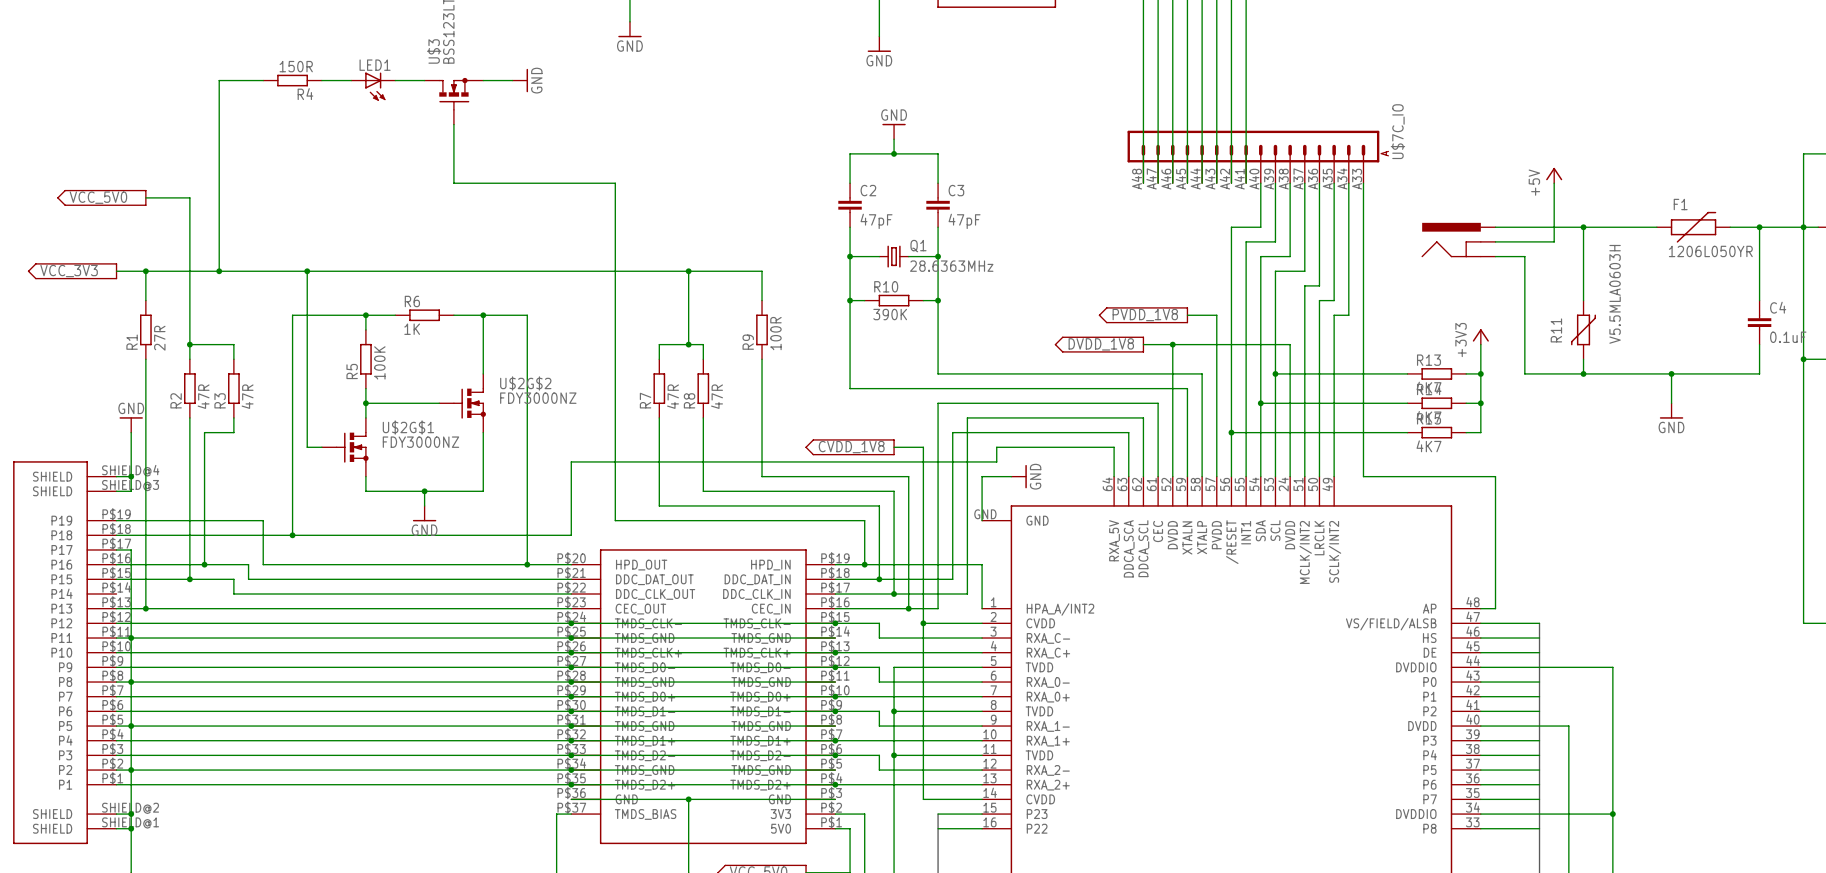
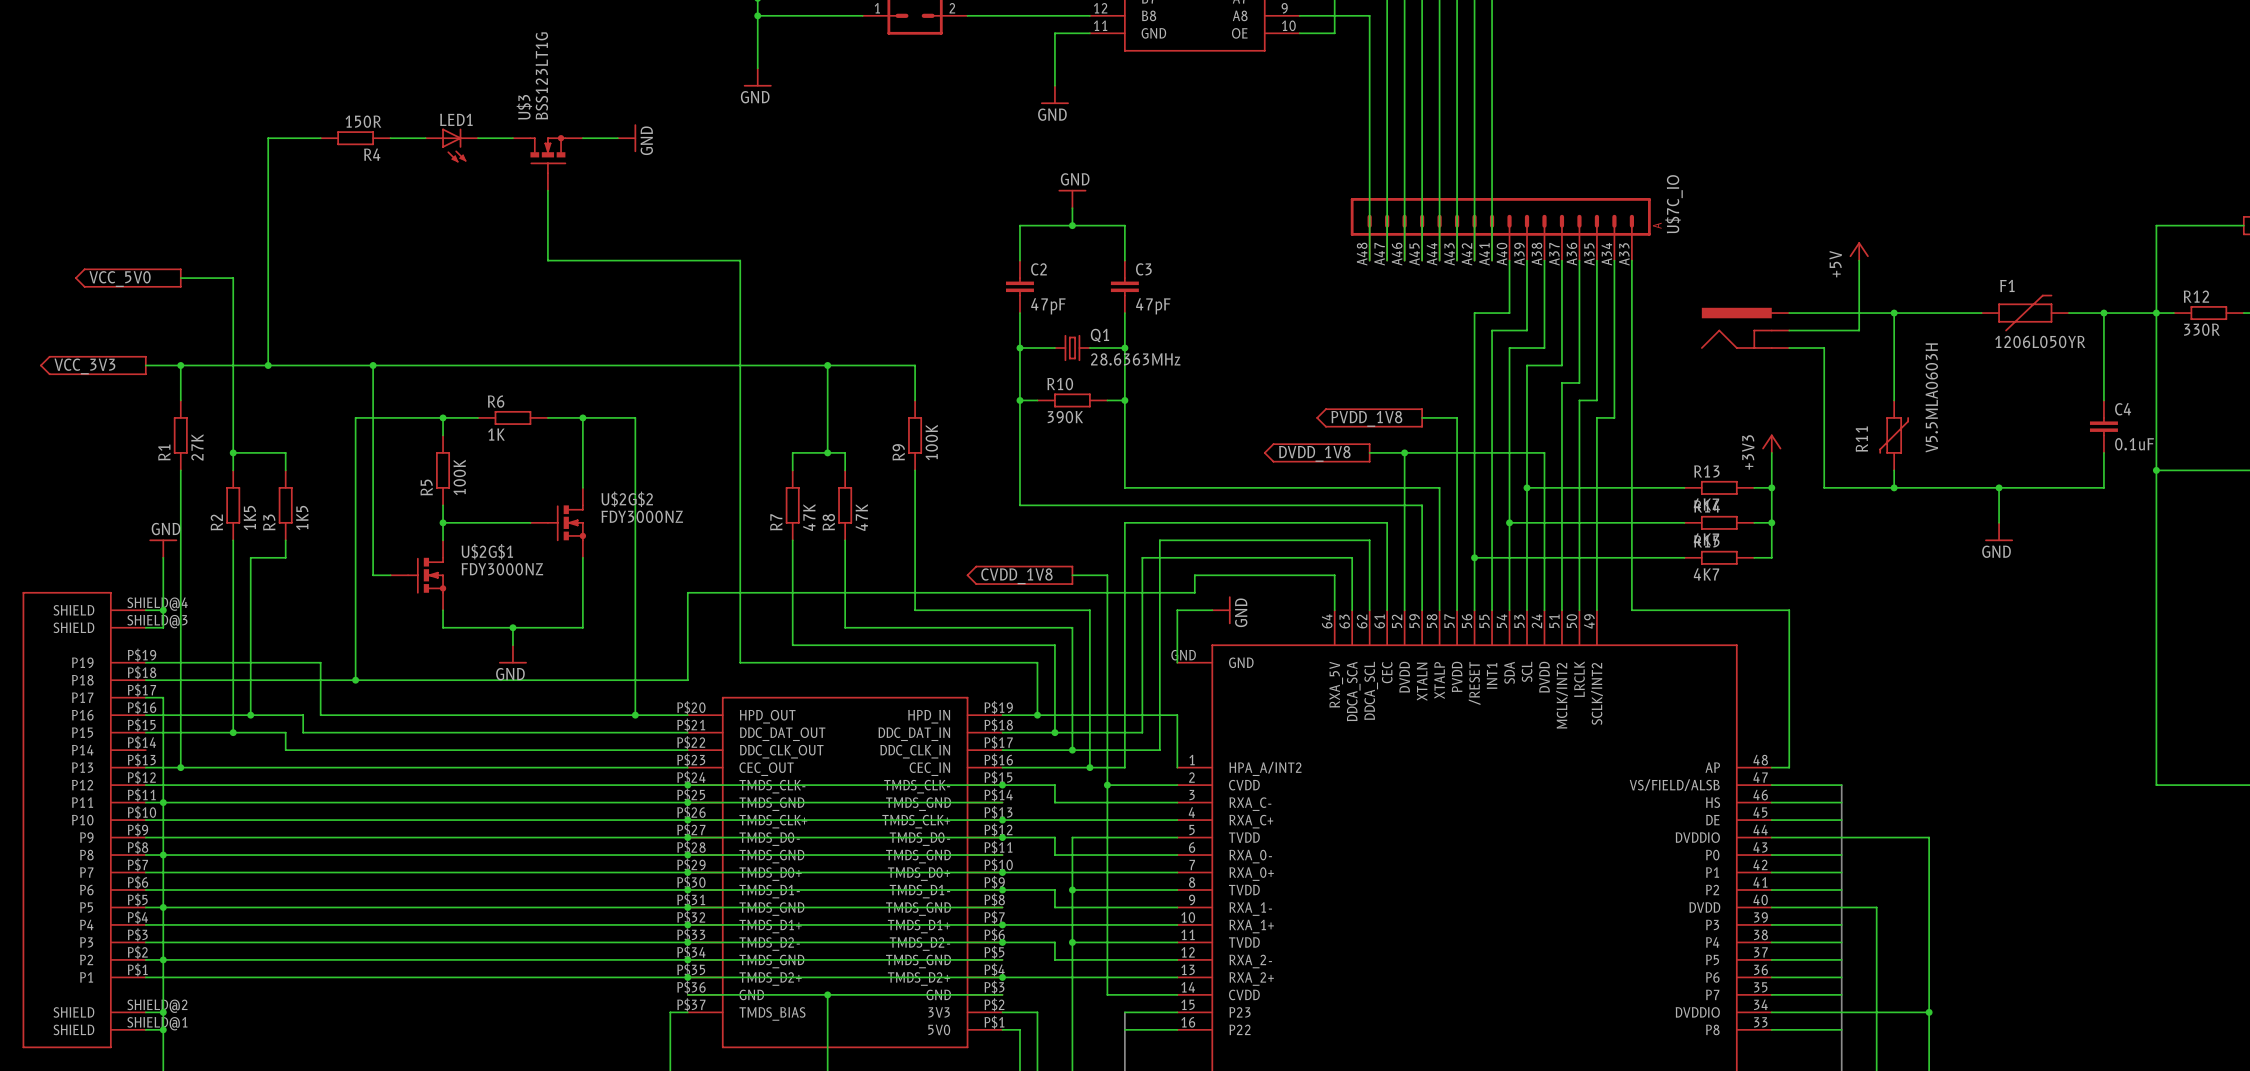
R9 value: 100R (775, 333) -> 100K (931, 442)
R1 value: 27R (159, 338) -> 27K (197, 447)
R2 value: 47R (203, 396) -> 1K5 (249, 518)
R3 value: 47R (247, 396) -> 1K5 (302, 518)
R7 value: 47R (673, 396) -> 47K (809, 517)
R8 value: 47R (717, 396) -> 47K (861, 517)

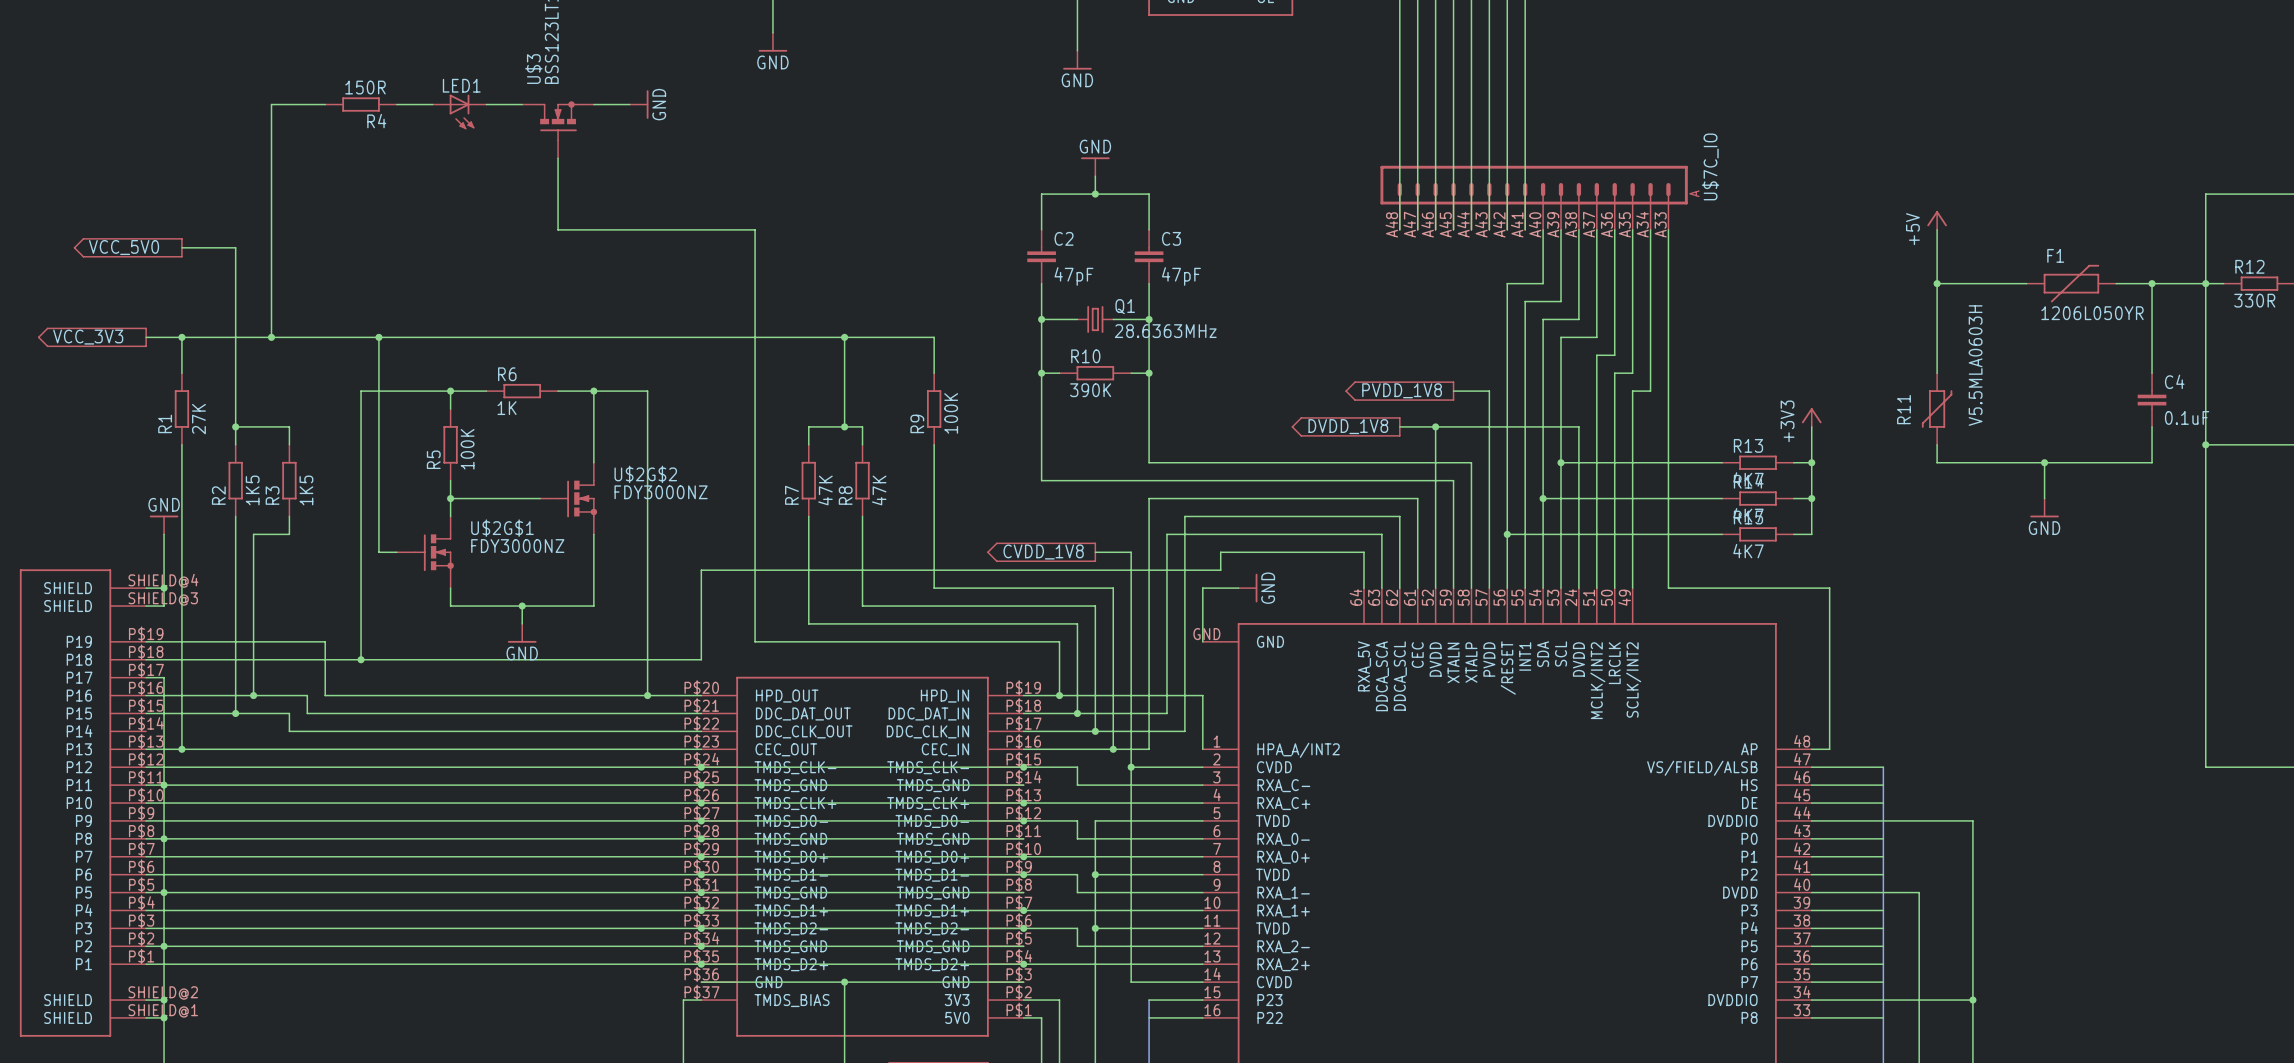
power symbol position: +5V (1859, 251) -> +5V (1937, 220)
wire: (1859, 260) (1859, 330) (1789, 330) -> none
wire: (1789, 313) (1894, 313) -> (1937, 229) (1937, 283)
part: (1745, 328) -> none
wire: (1789, 348) (1824, 348) (1824, 487) (1894, 487) -> none
junction: (1894, 487) -> none

